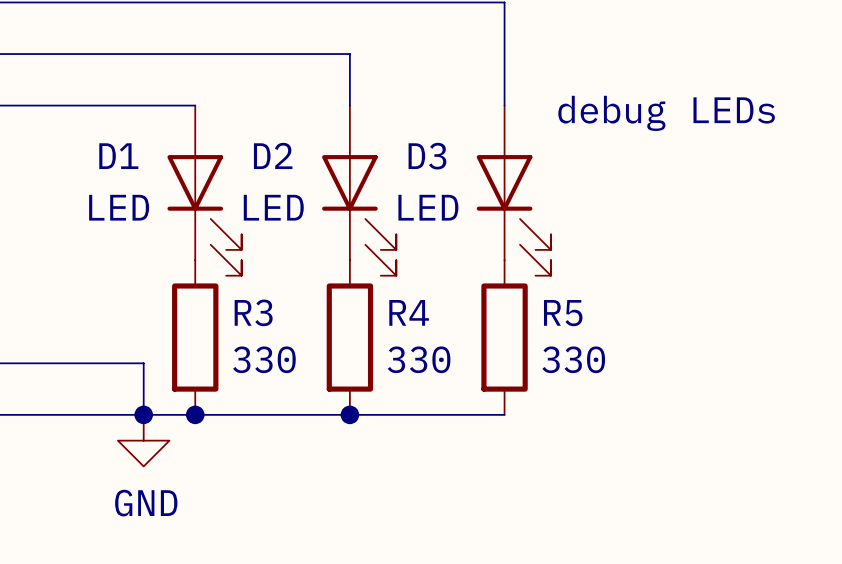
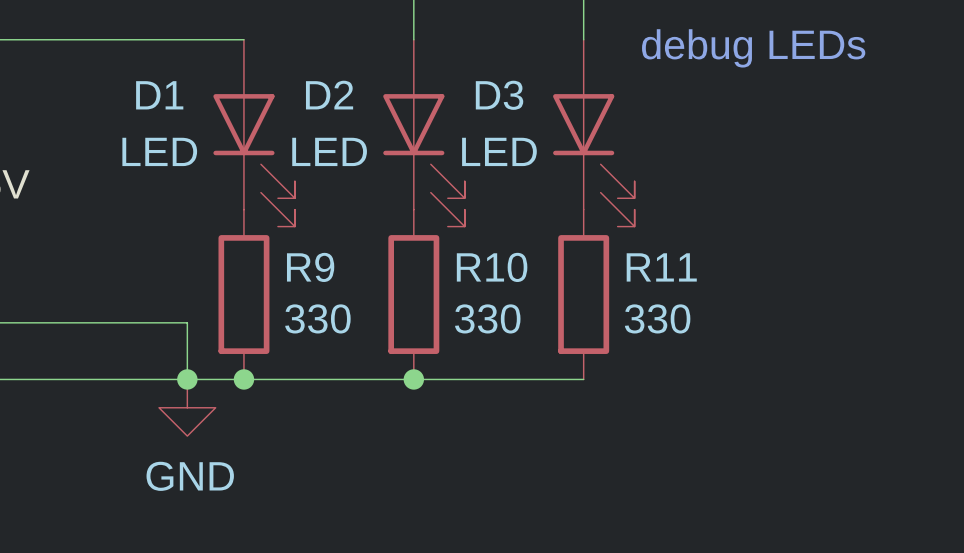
R3 name: R3 (253, 312) -> R9 (310, 267)
R4 name: R4 (409, 312) -> R10 (492, 267)
R5 name: R5 (563, 313) -> R11 (661, 267)

